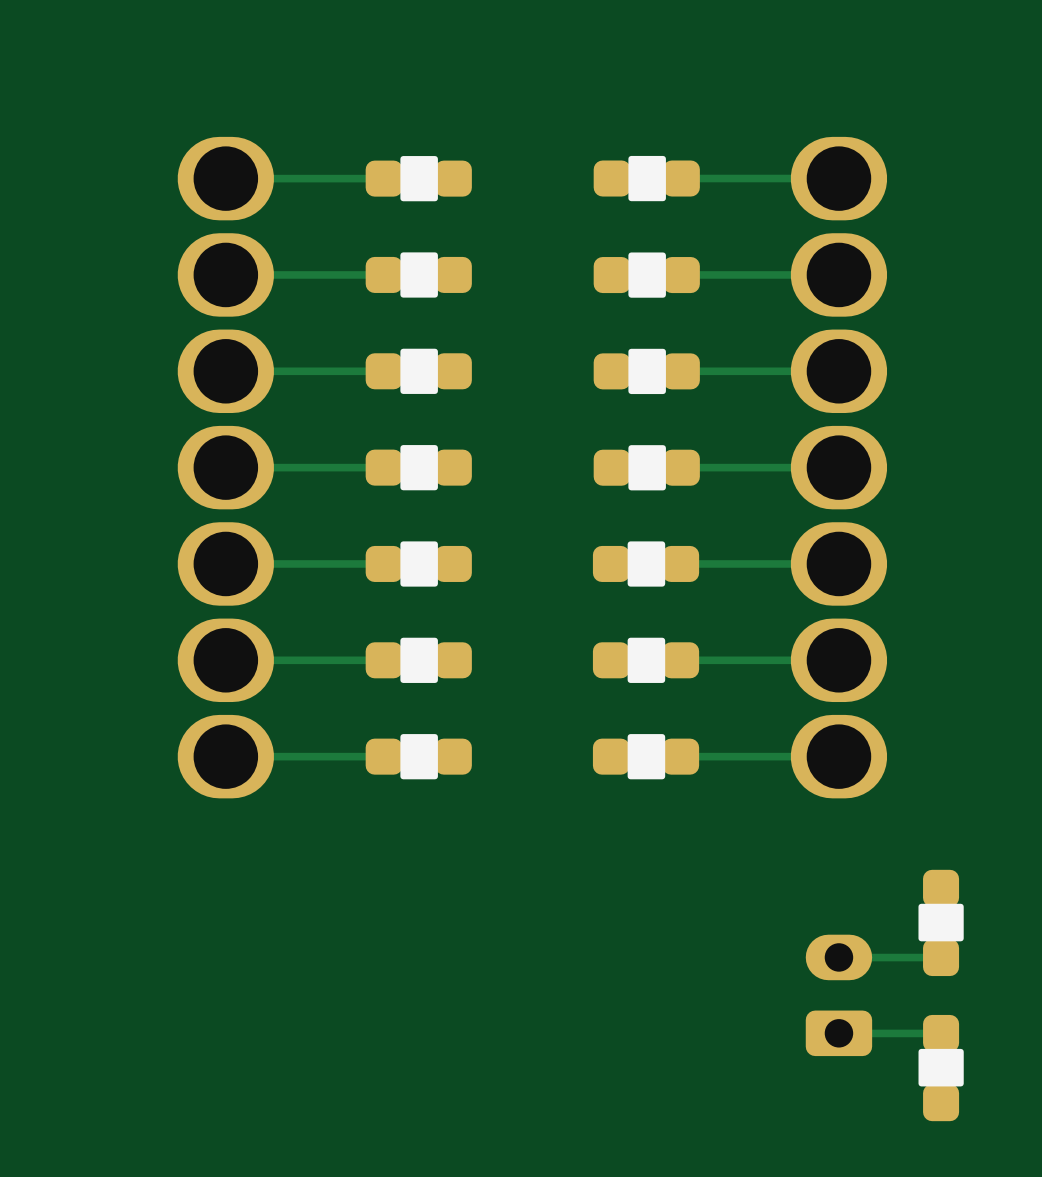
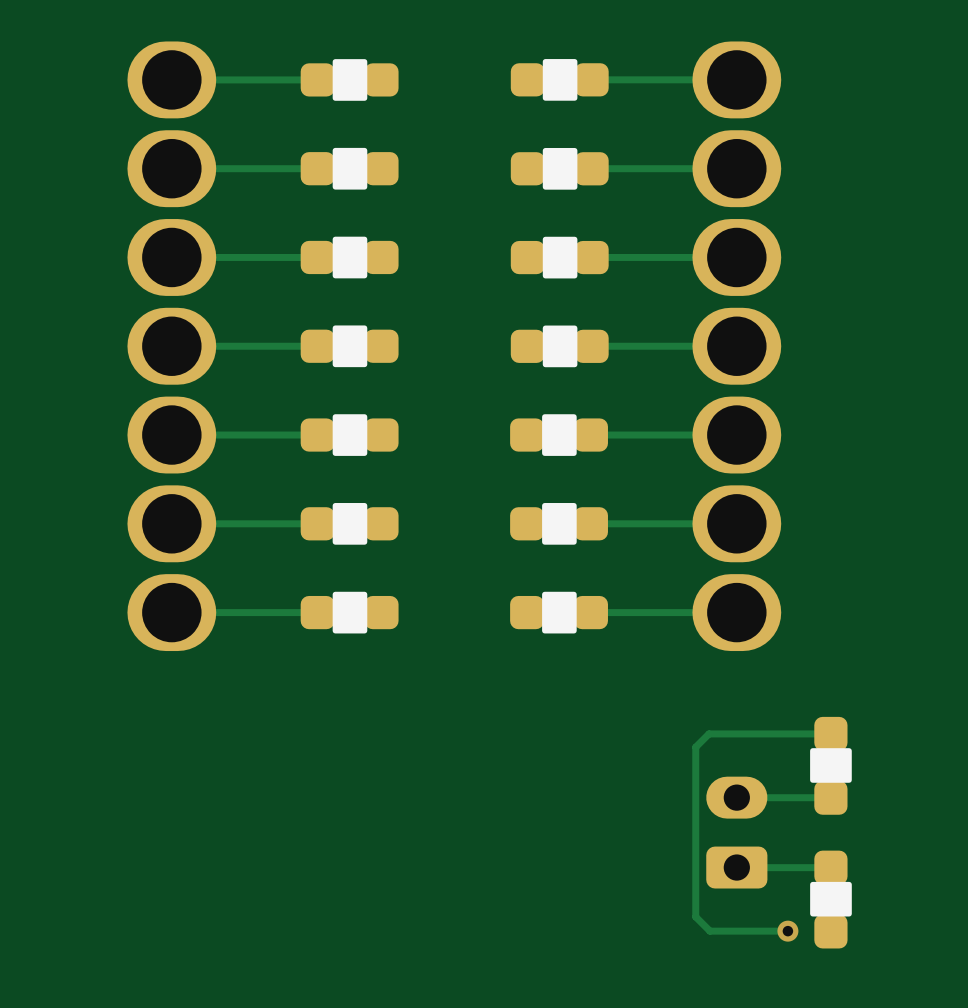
track: none -> (830, 733) (709, 733) (695, 747) (695, 916) (709, 931) (787, 931)
via: none -> (787, 931)

